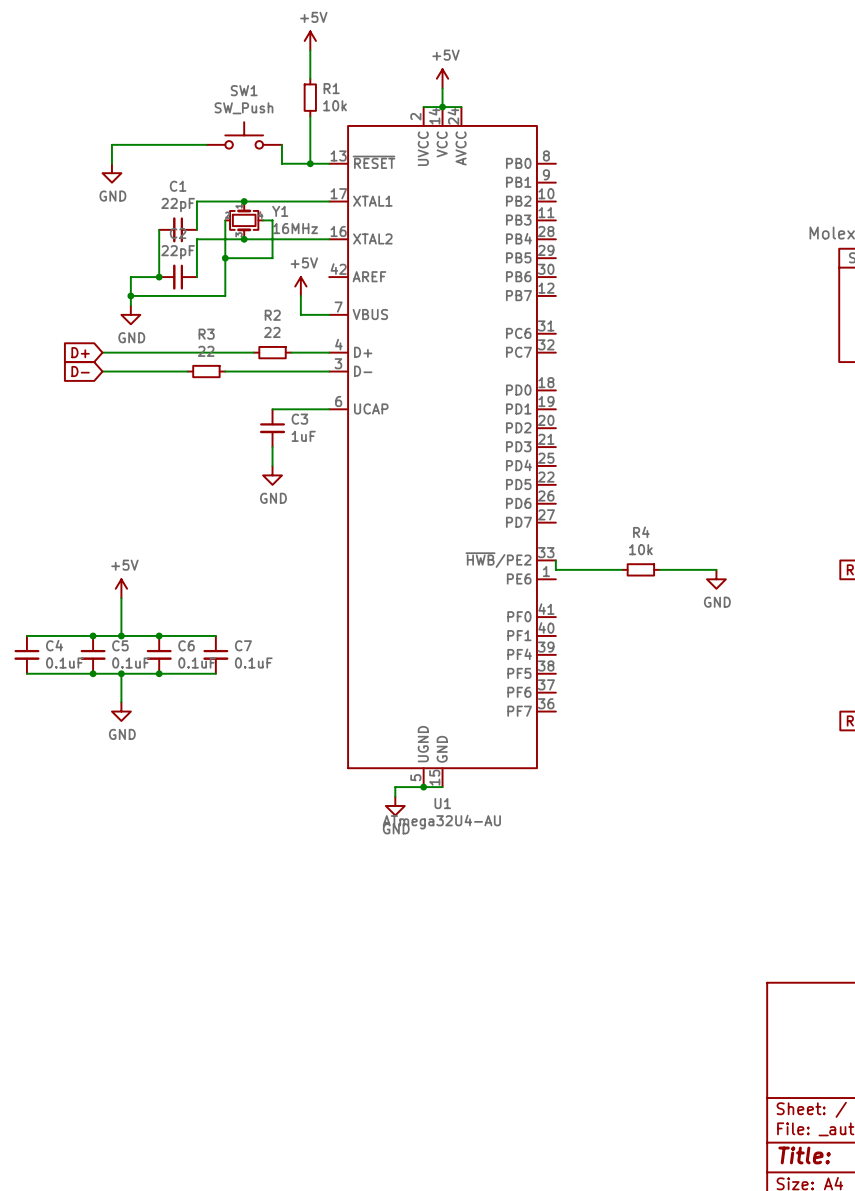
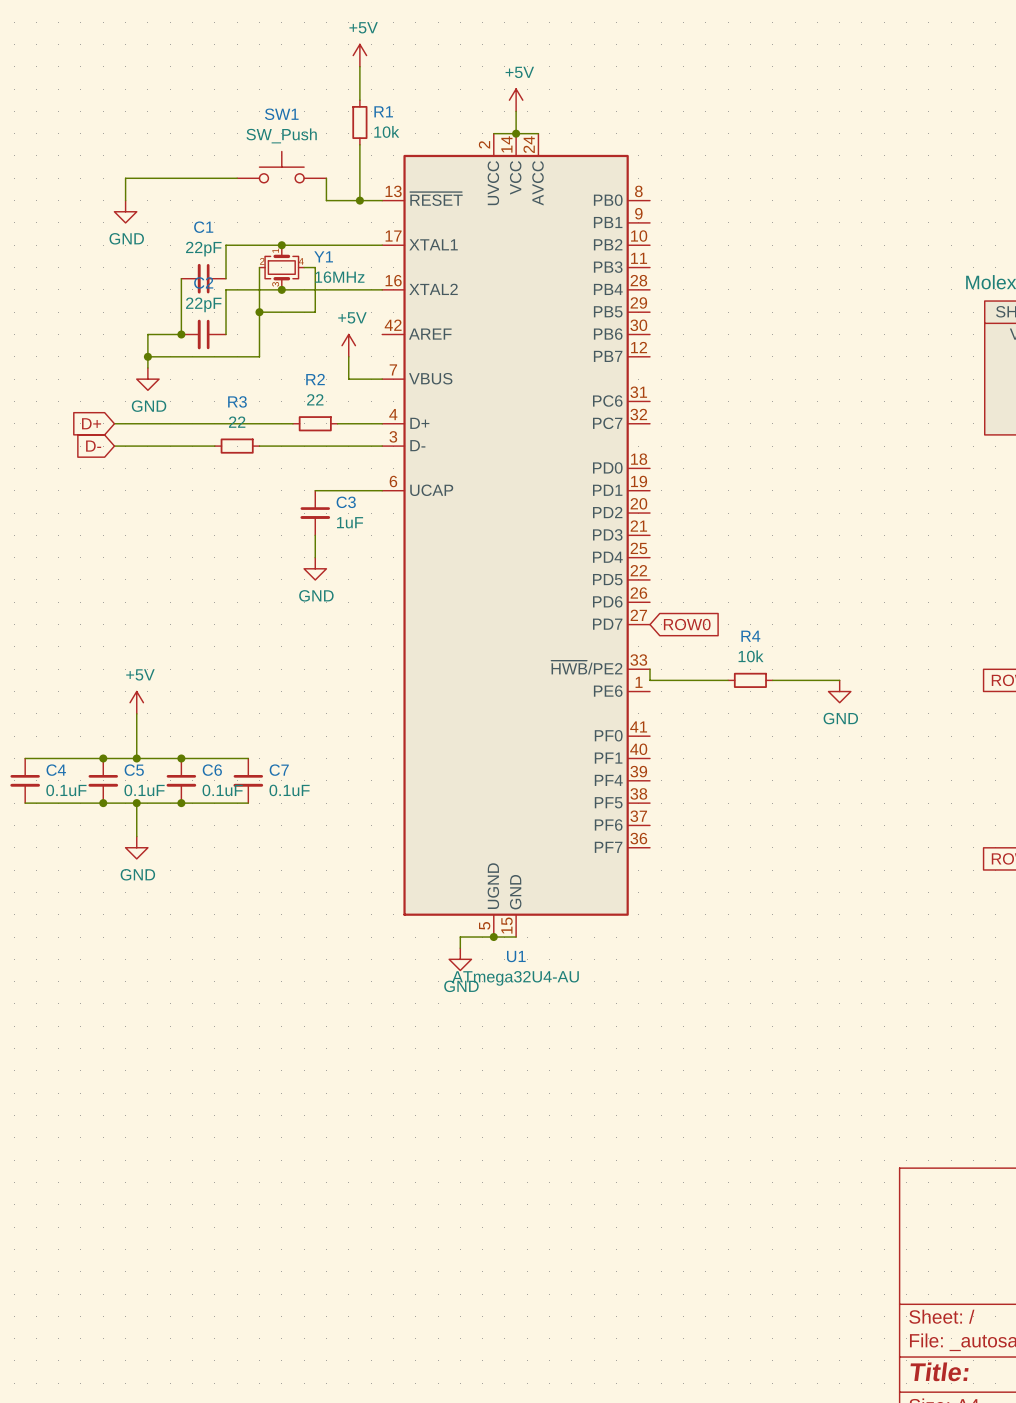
global label: none -> ROW0 (687, 624)

